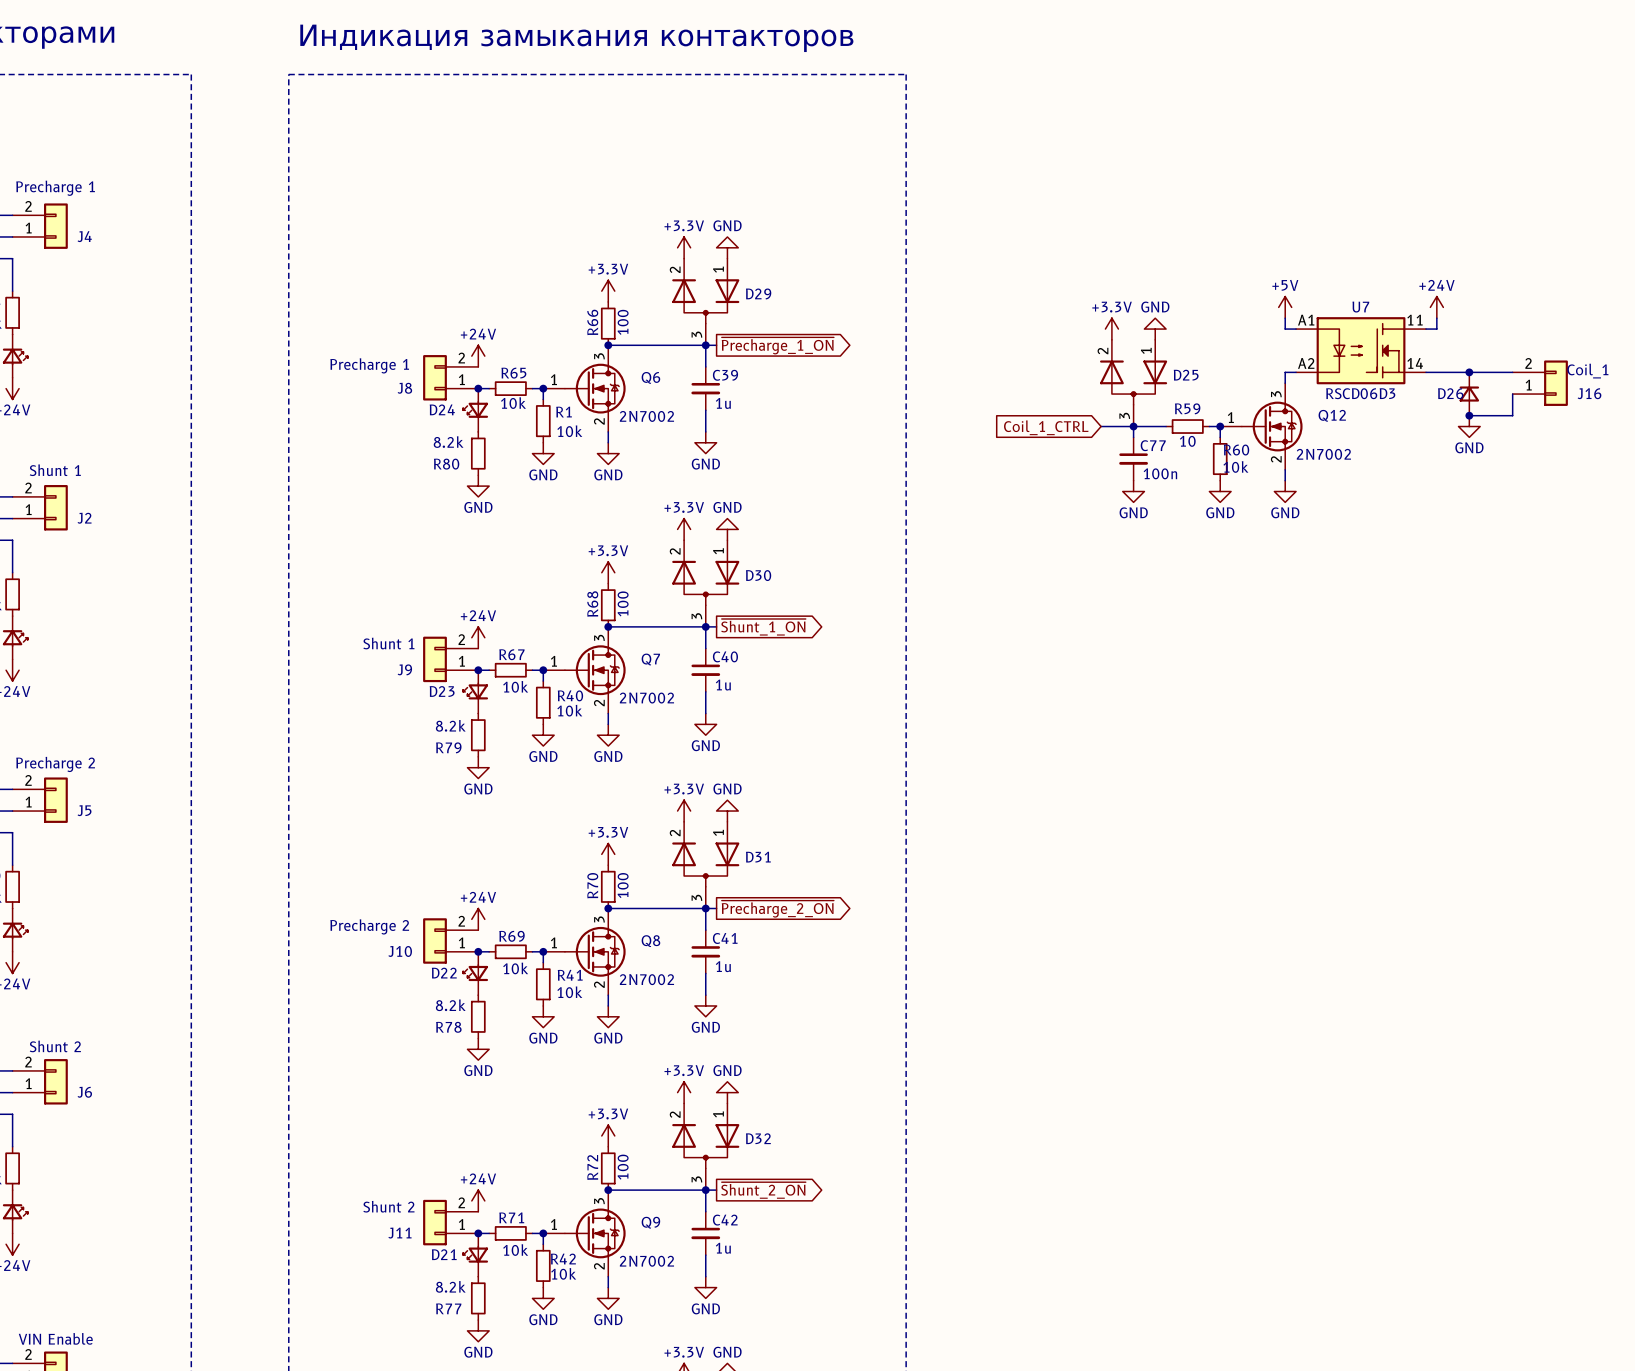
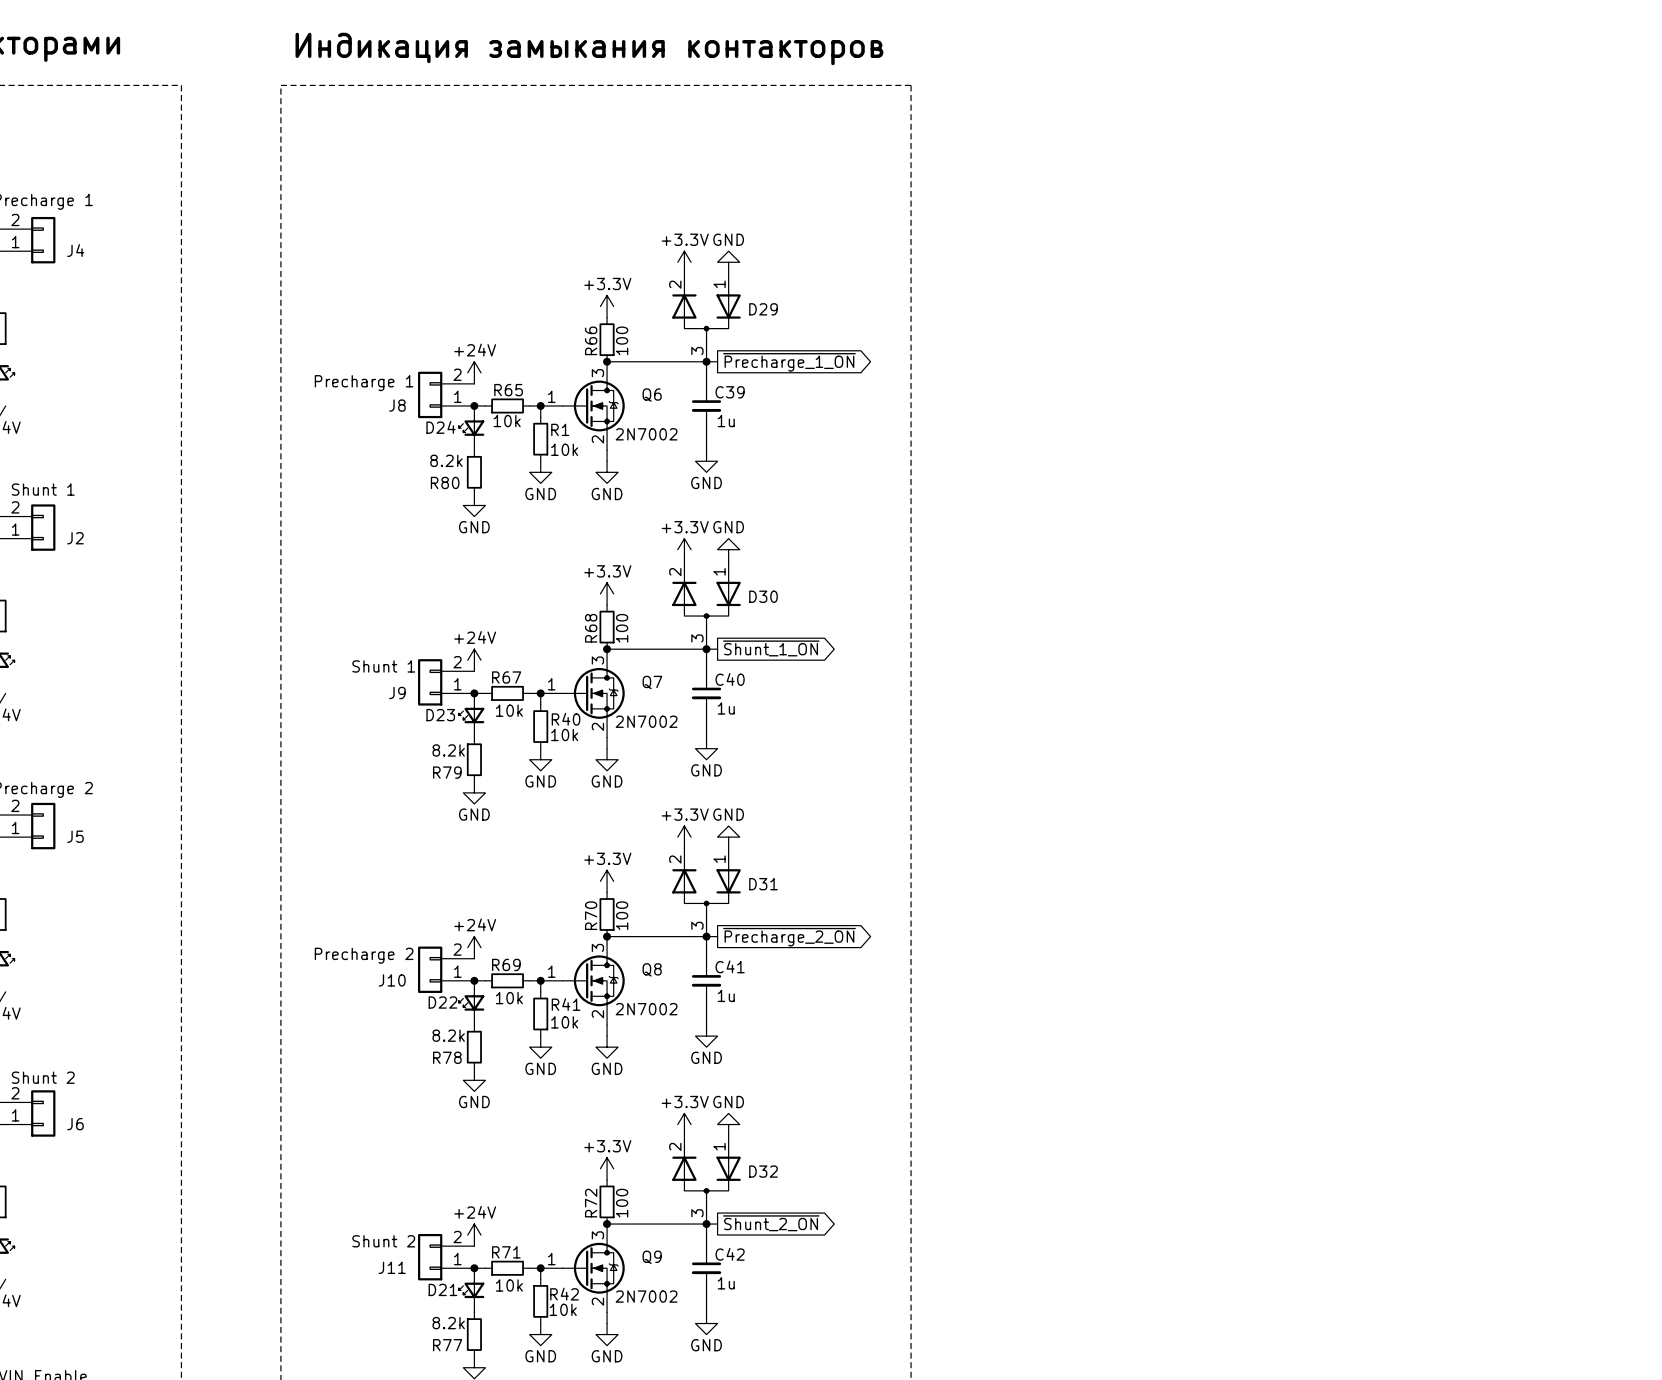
power symbol: +5V (1285, 307) -> none
power symbol: +24V (1436, 307) -> none
wire: (1285, 318) (1285, 329) (1296, 329) -> none
wire: (1436, 318) (1436, 329) (1426, 329) -> none
power symbol: +3.3V (1111, 329) -> none
power symbol: GND (1155, 329) -> none
U7: RSCD06D3 (1361, 350) -> none
wire: (1296, 372) (1285, 372) (1285, 383) -> none
wire: (1426, 372) (1512, 372) -> none
junction: (1469, 372) -> none
D25: (1133, 383) -> none
J16: (1540, 383) -> none
D26: (1469, 394) -> none
wire: (1512, 394) (1512, 415) (1469, 415) -> none
junction: (1469, 415) -> none
wire: (1101, 426) (1166, 426) -> none
wire: (1133, 426) (1133, 437) -> none
junction: (1133, 426) -> none
R59: 10 (1187, 426) -> none
wire: (1209, 426) (1220, 426) (1220, 437) -> none
junction: (1220, 426) -> none
Q12: (1261, 426) -> none
power symbol: GND (1469, 426) -> none
global label: Coil_1_CTRL (1046, 427) -> none
C77: 100n (1133, 459) -> none
R60: 10k (1220, 459) -> none
wire: (1285, 469) (1285, 480) -> none
power symbol: GND (1133, 491) -> none
power symbol: GND (1220, 491) -> none
power symbol: GND (1285, 491) -> none

